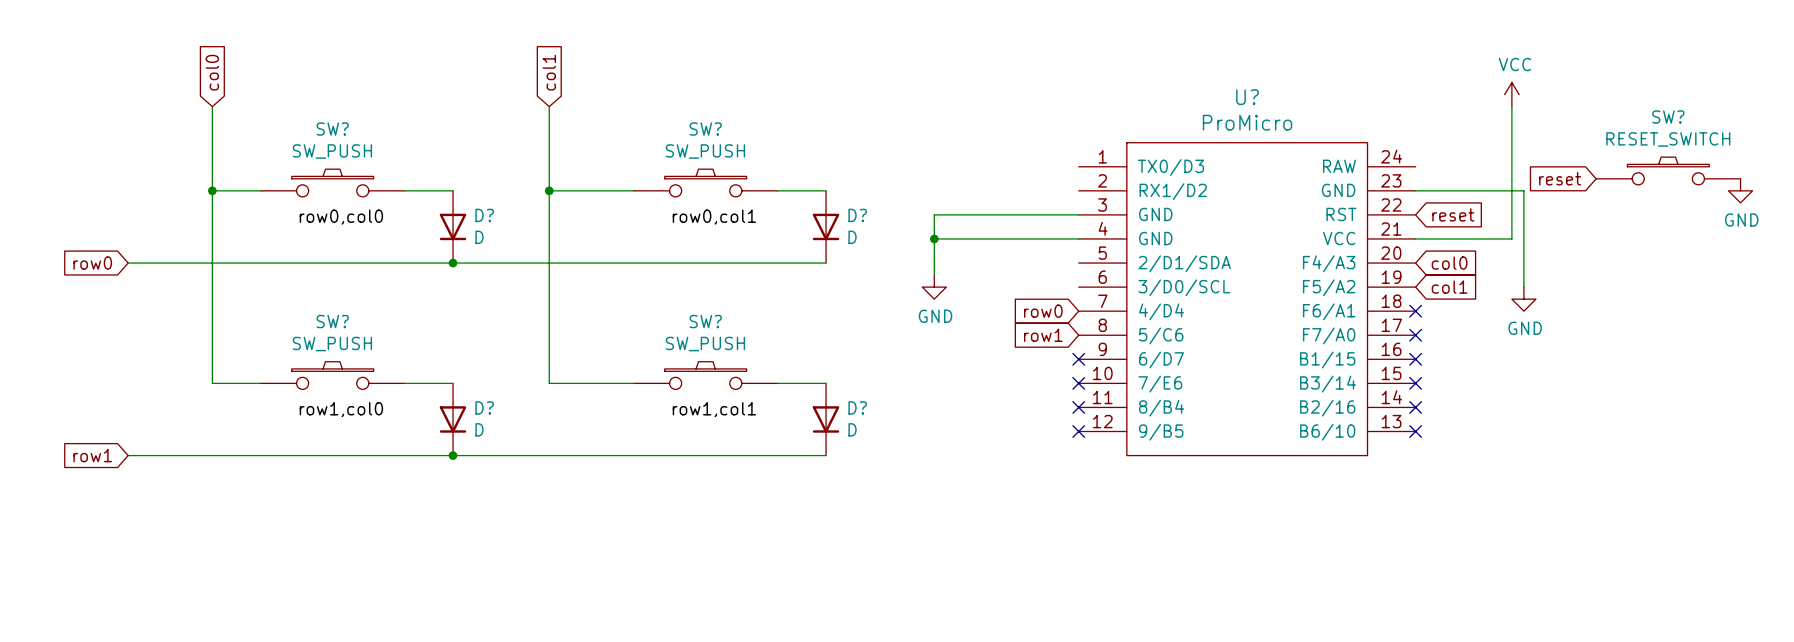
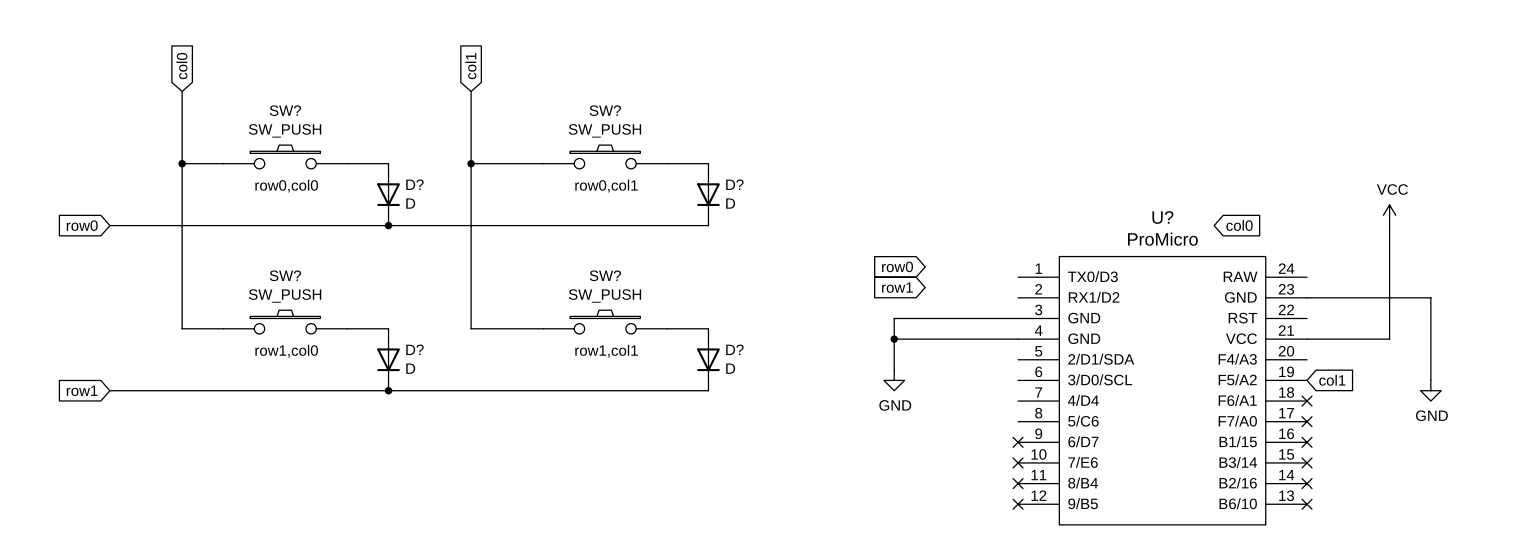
power symbol position: VCC (1511, 94) -> VCC (1389, 215)
wire: (1511, 106) (1511, 238) (1415, 238) -> (1389, 225) (1389, 339) (1307, 339)
SW?: RESET_SWITCH (1668, 170) -> none
global label: reset (1560, 178) -> none
wire: (1415, 190) (1523, 190) (1523, 287) -> none
power symbol: GND (1740, 190) -> none
wire: (1078, 214) (934, 214) (934, 275) -> (1018, 318) (894, 318) (894, 370)
global label: reset (1453, 214) -> none
wire: (934, 238) (1078, 238) -> (894, 339) (1018, 339)
junction: (934, 238) -> none
power symbol position: GND (934, 287) -> GND (894, 380)
global label position: col1 (1449, 287) -> col1 (1332, 380)
U? position: (1247, 299) -> (1162, 390)
power symbol: GND (1523, 299) -> none
no-connect mark: (1415, 311) -> none
no-connect mark: (1415, 335) -> none
wire: none -> (1307, 297) (1430, 297) (1430, 380)
no-connect mark: (1078, 359) -> none
no-connect mark: (1415, 359) -> none
no-connect mark: (1078, 383) -> none
no-connect mark: (1415, 383) -> none
junction: none -> (894, 339)
no-connect mark: (1078, 407) -> none
no-connect mark: (1415, 407) -> none
no-connect mark: (1078, 431) -> none
no-connect mark: (1415, 431) -> none
power symbol: none -> GND (1430, 390)
no-connect mark: none -> (1307, 401)
no-connect mark: none -> (1307, 421)
no-connect mark: none -> (1018, 442)
no-connect mark: none -> (1307, 442)
no-connect mark: none -> (1018, 462)
no-connect mark: none -> (1307, 462)
no-connect mark: none -> (1018, 483)
no-connect mark: none -> (1307, 483)
no-connect mark: none -> (1018, 504)
no-connect mark: none -> (1307, 504)

